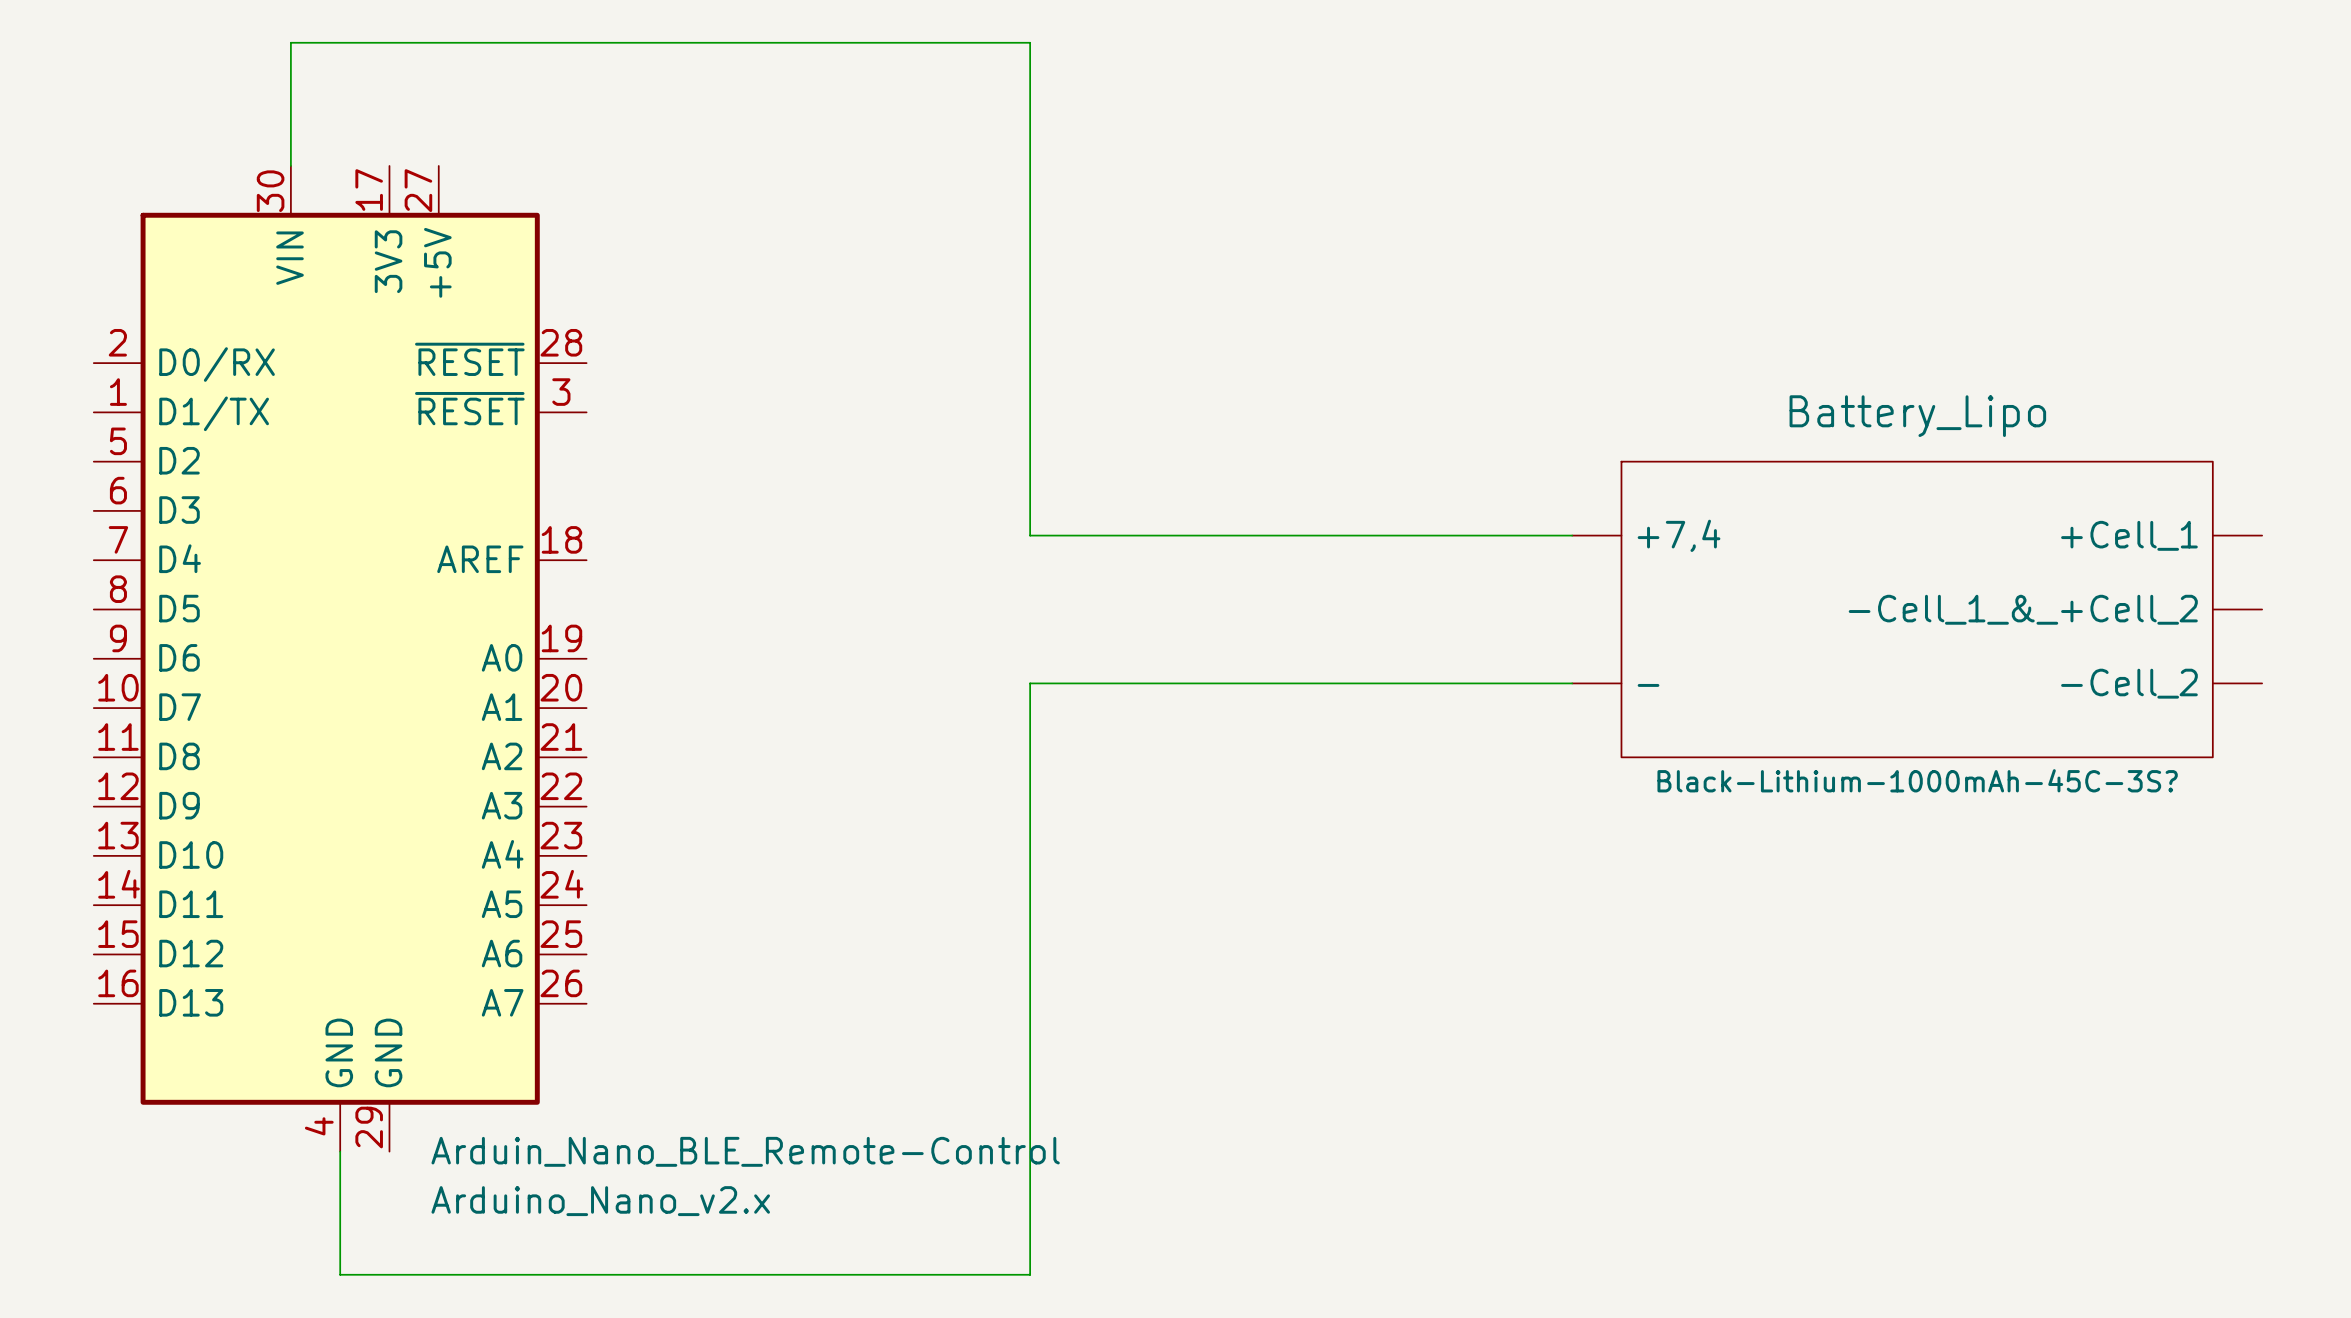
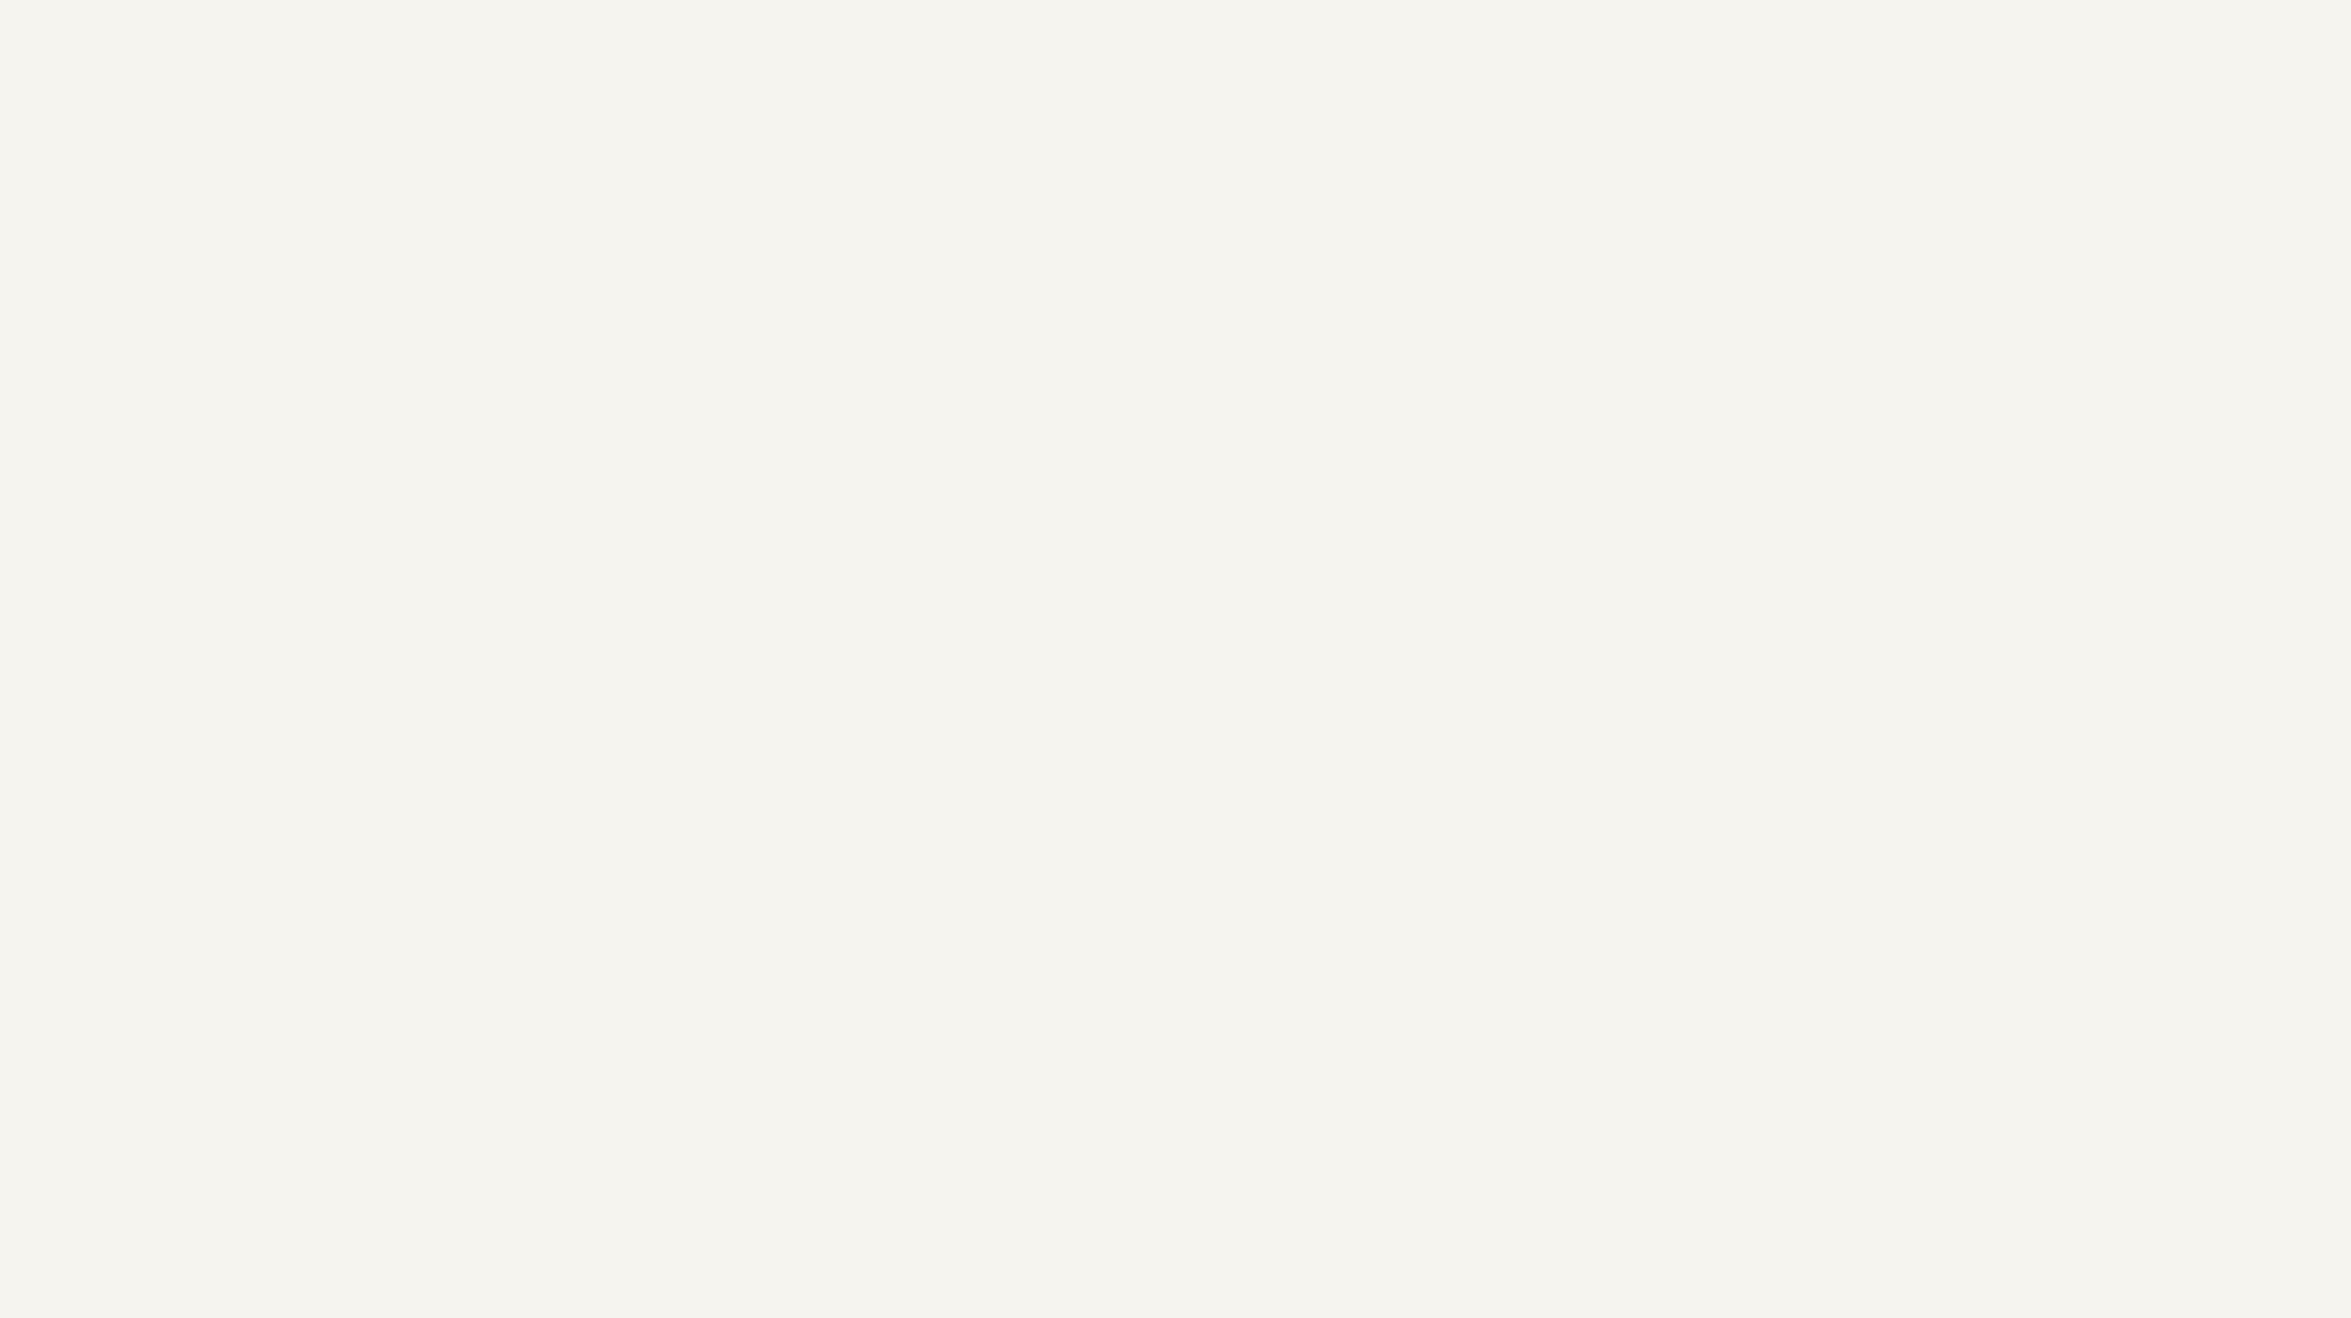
wire: (290, 165) (290, 42) (1030, 42) (1030, 535) (1572, 535) -> none
Black-Lithium-1000mAh-45C-3S?: Battery_Lipo (1917, 609) -> none
Arduin_Nano_BLE_Remote-Control: Arduino_Nano_v2.x (340, 658) -> none
wire: (1572, 683) (1030, 683) (1030, 1274) (340, 1274) (340, 1151) -> none

